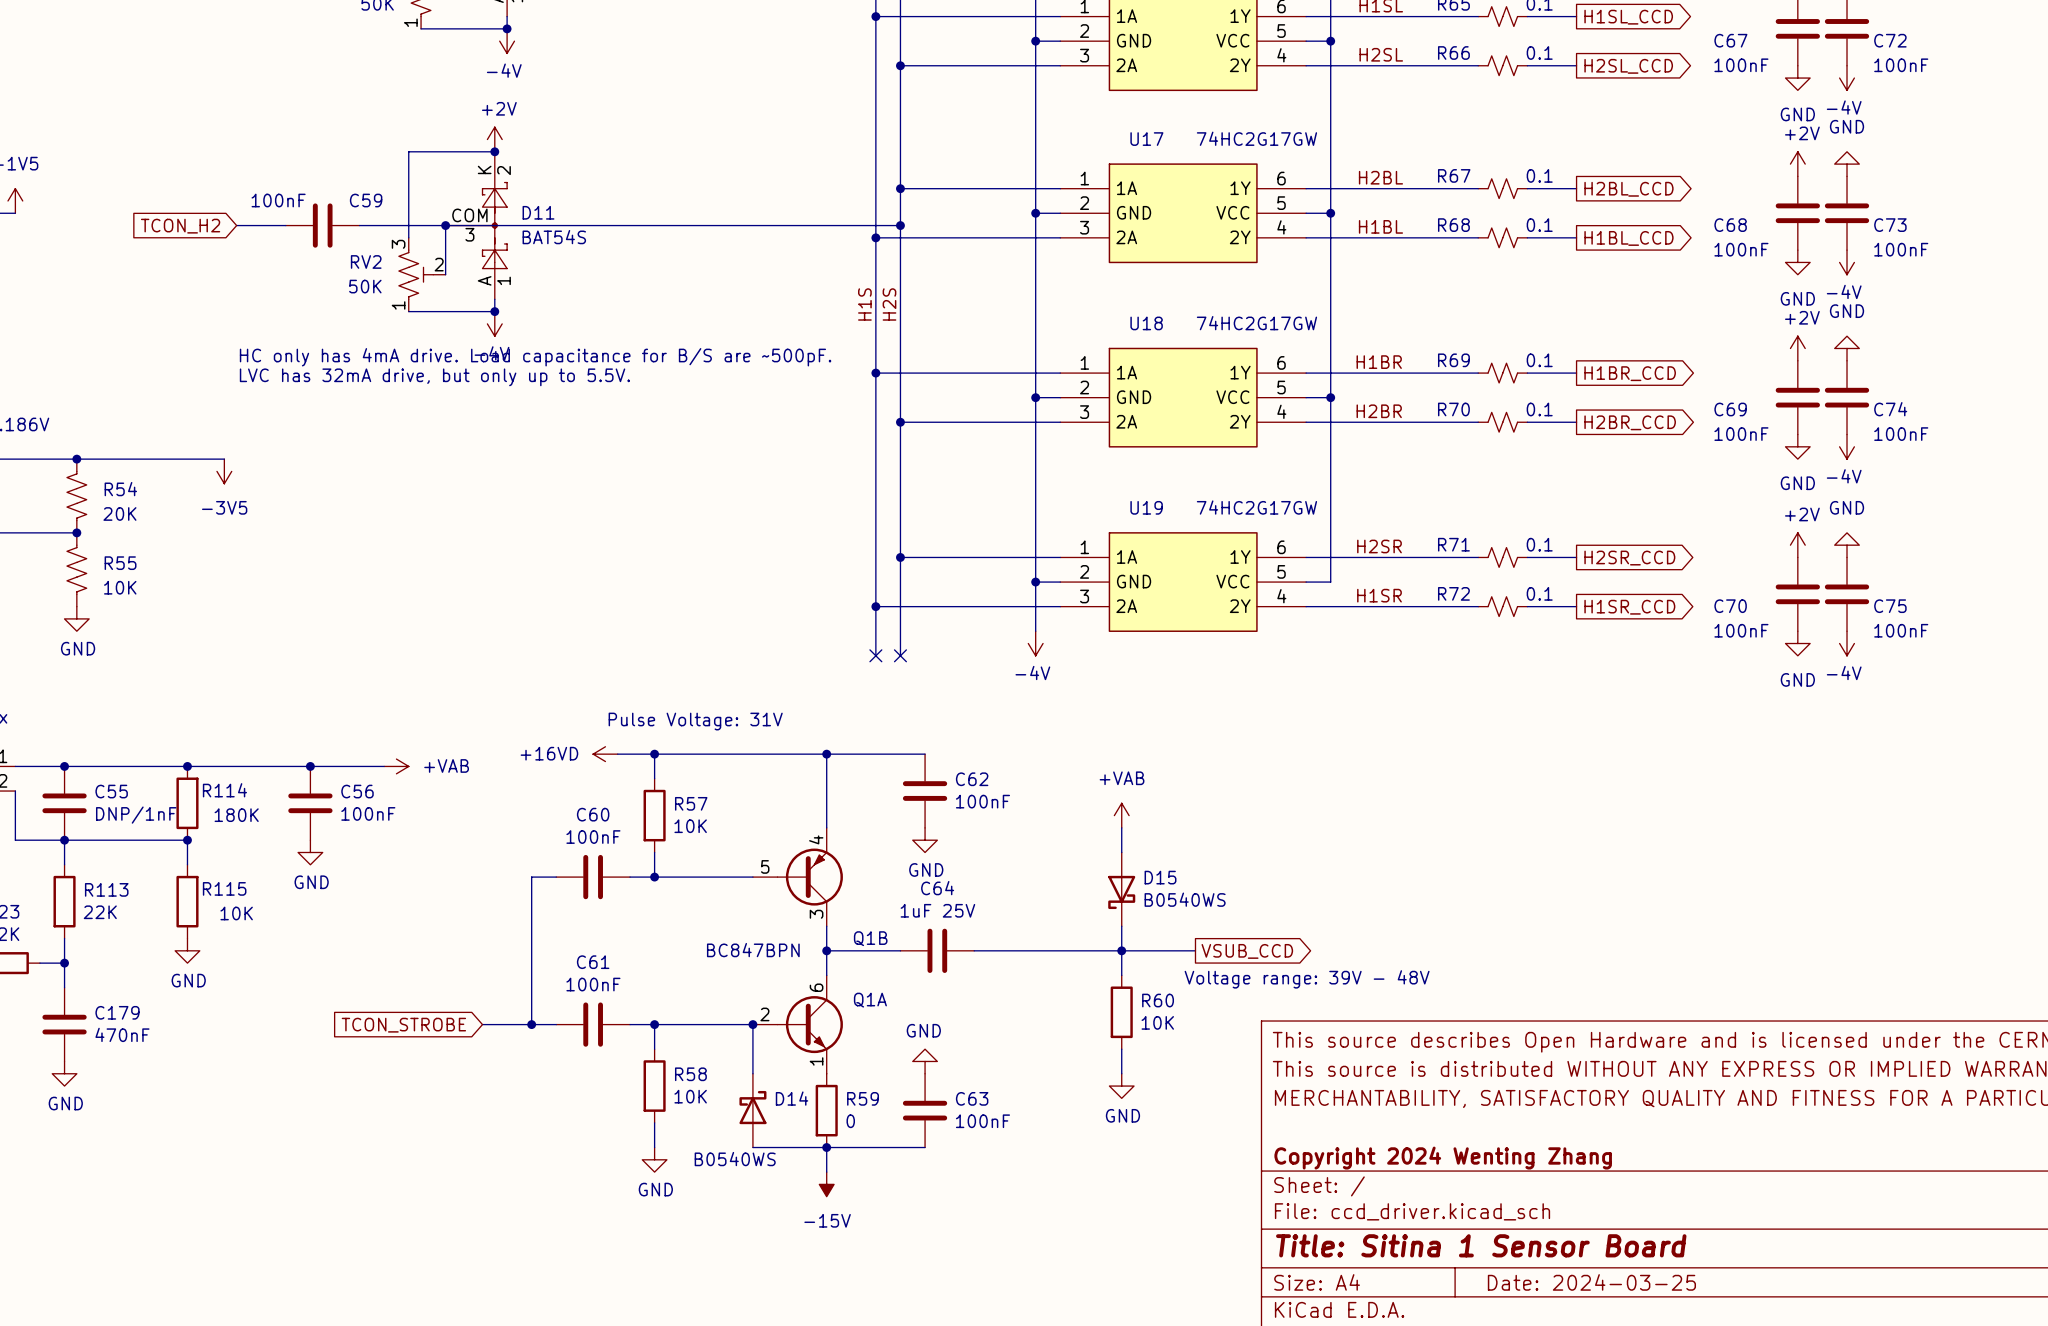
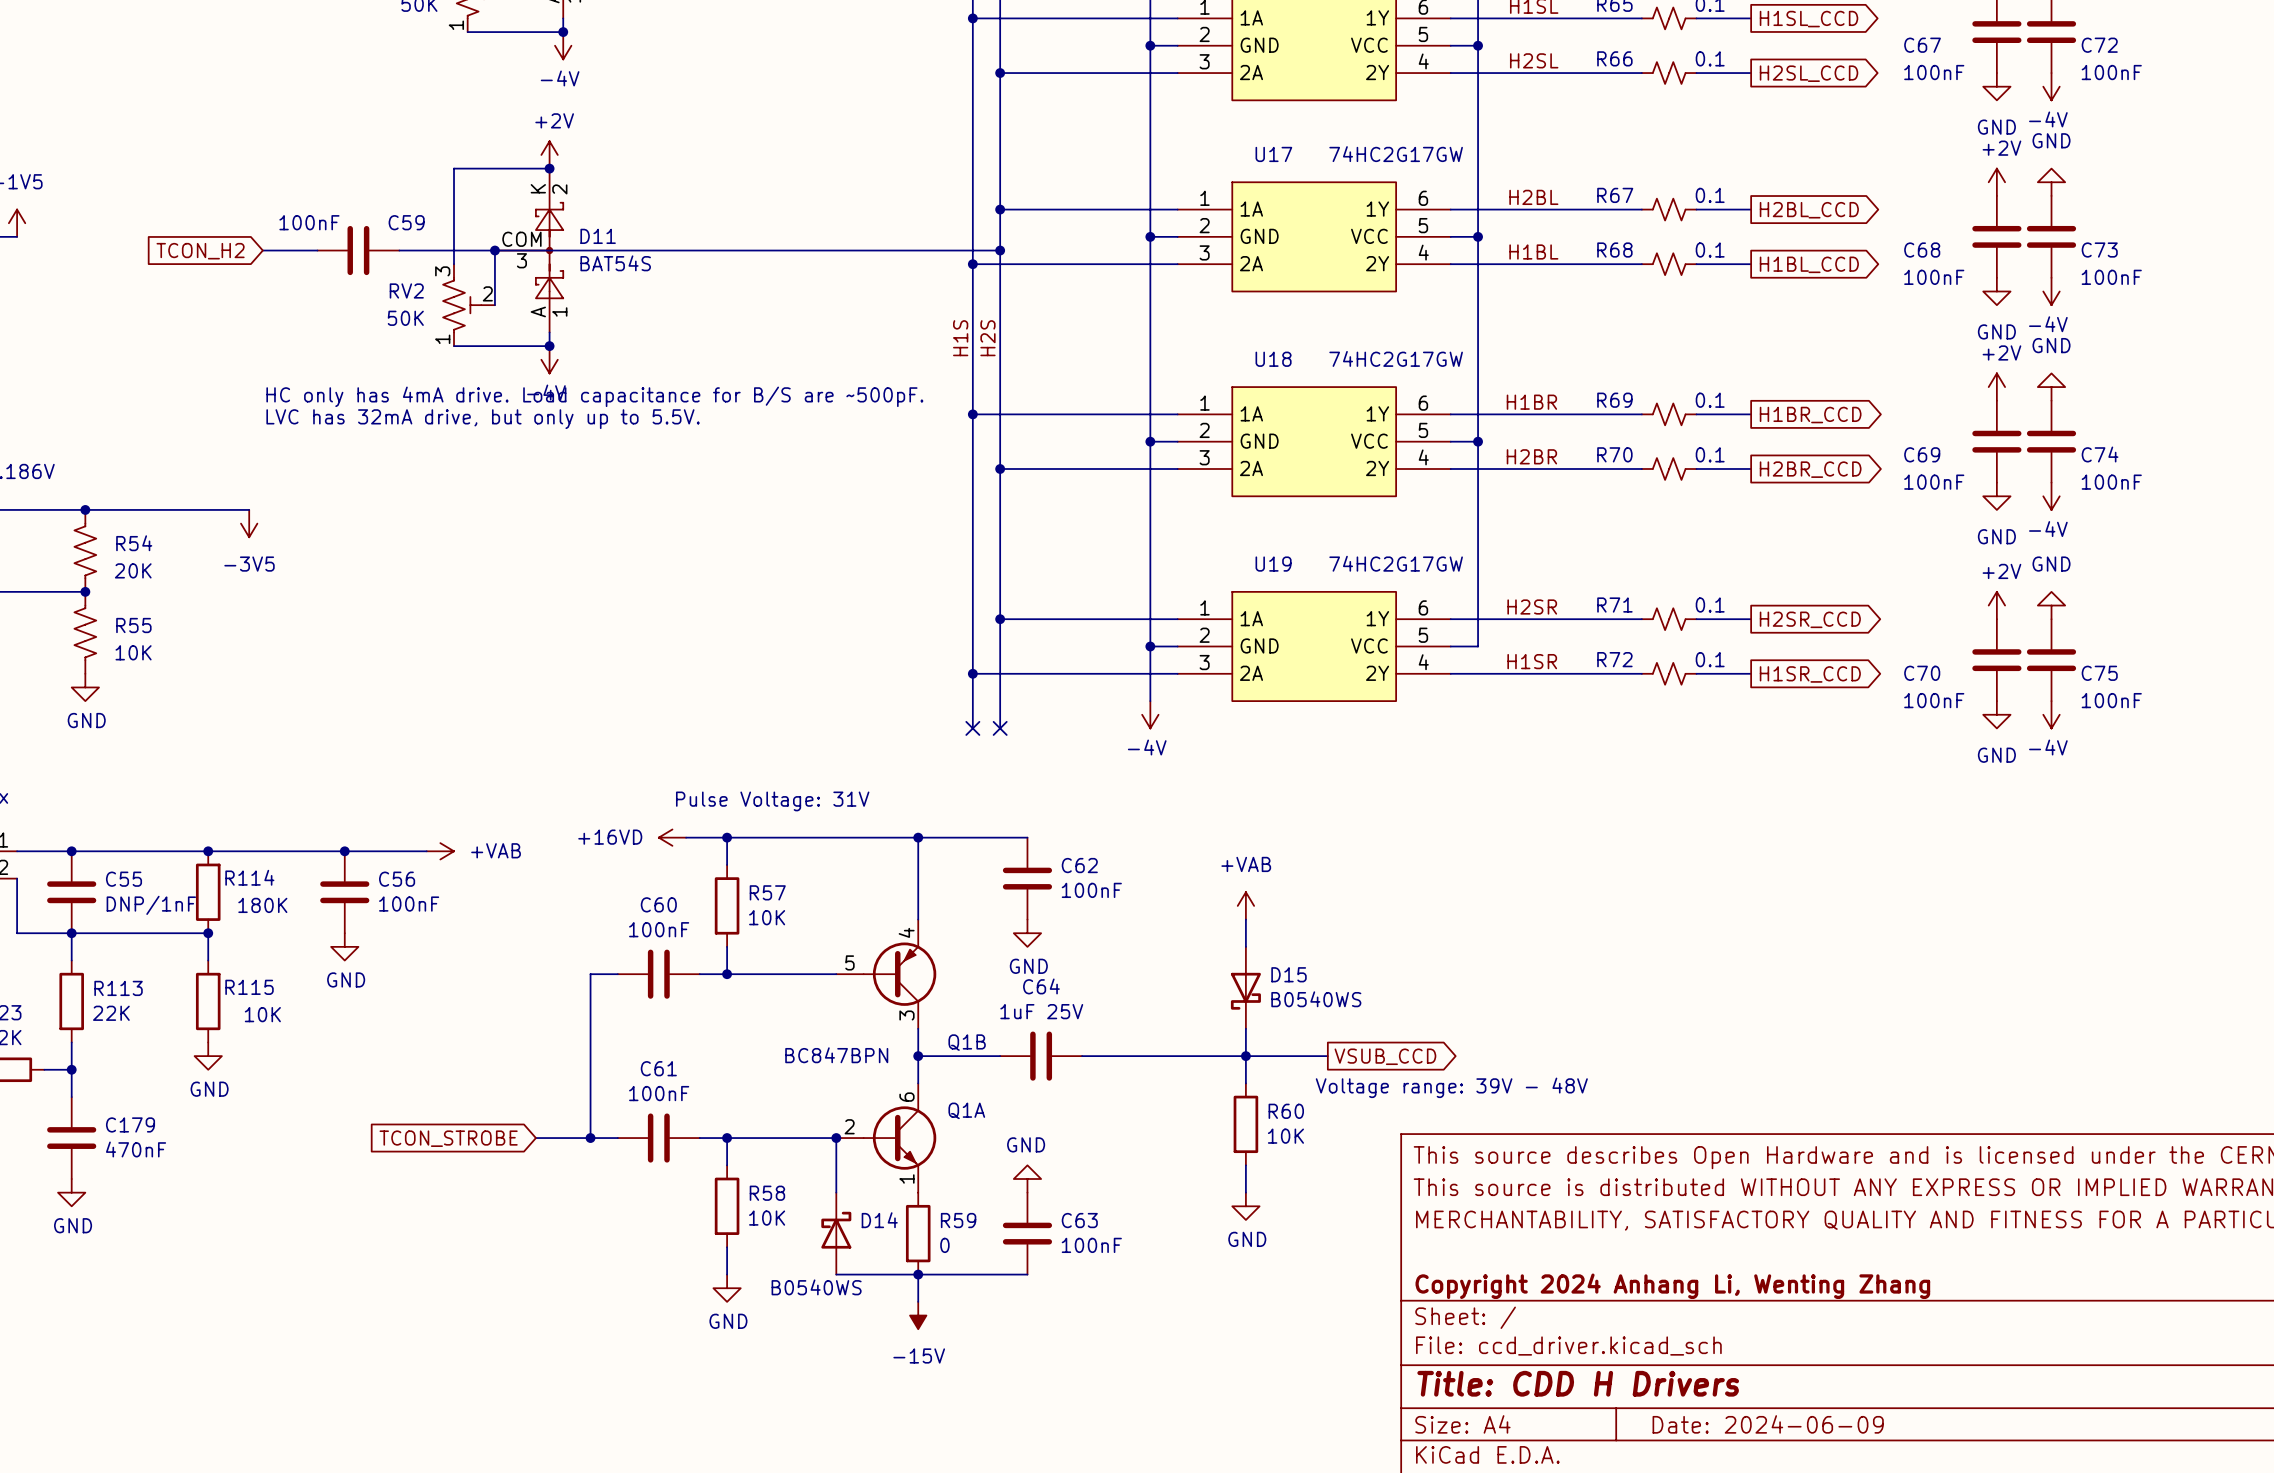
title block: Copyright 2024 Wenting Zhang (1443, 1158) -> Copyright 2024 Anhang Li, Wenting Zhang (1672, 1286)
title block: Title: Sitina 1 Sensor Board (1481, 1245) -> Title: CDD H Drivers (1578, 1383)
title block: Date: 2024-03-25 (1591, 1282) -> Date: 2024-06-09 (1768, 1424)

